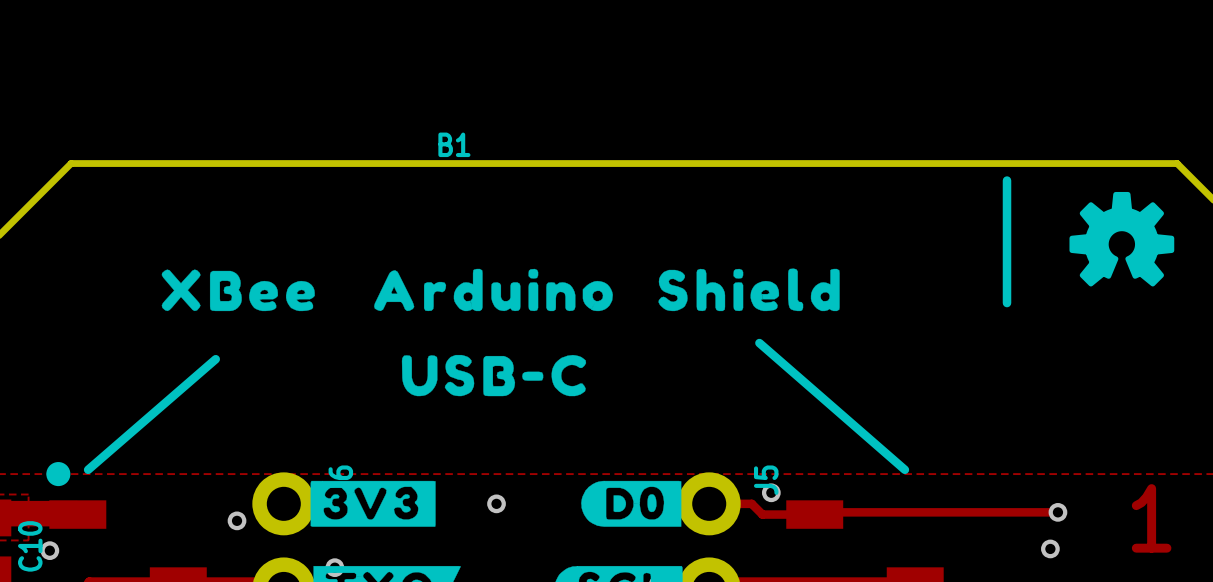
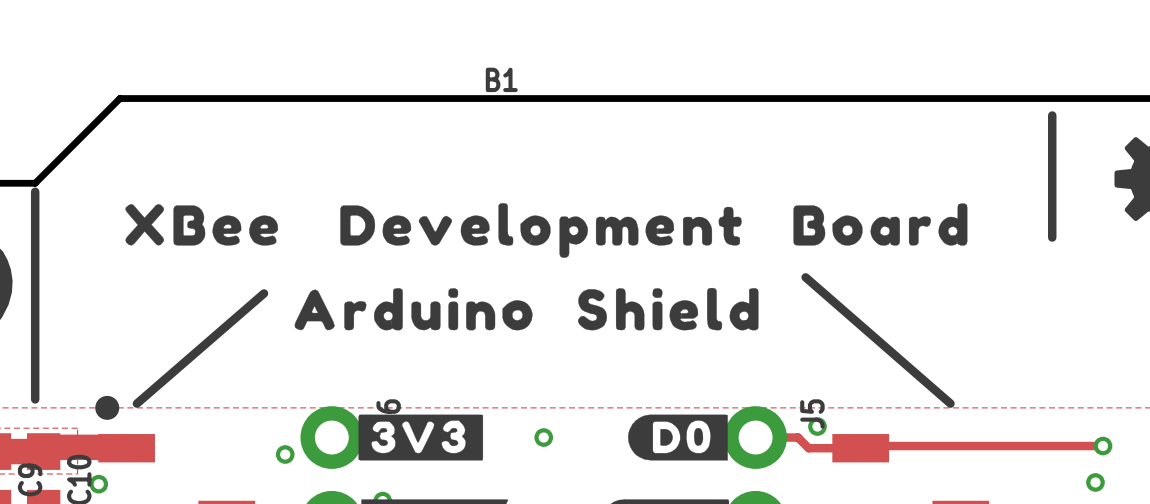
drawing: none -> [340, 203, 742, 258]
drawing: none -> [793, 203, 968, 246]
drawing position: (493, 289) -> (413, 309)
drawing position: (749, 289) -> (668, 309)
drawing position: (238, 290) -> (201, 224)
drawing: [401, 354, 587, 397] -> none

